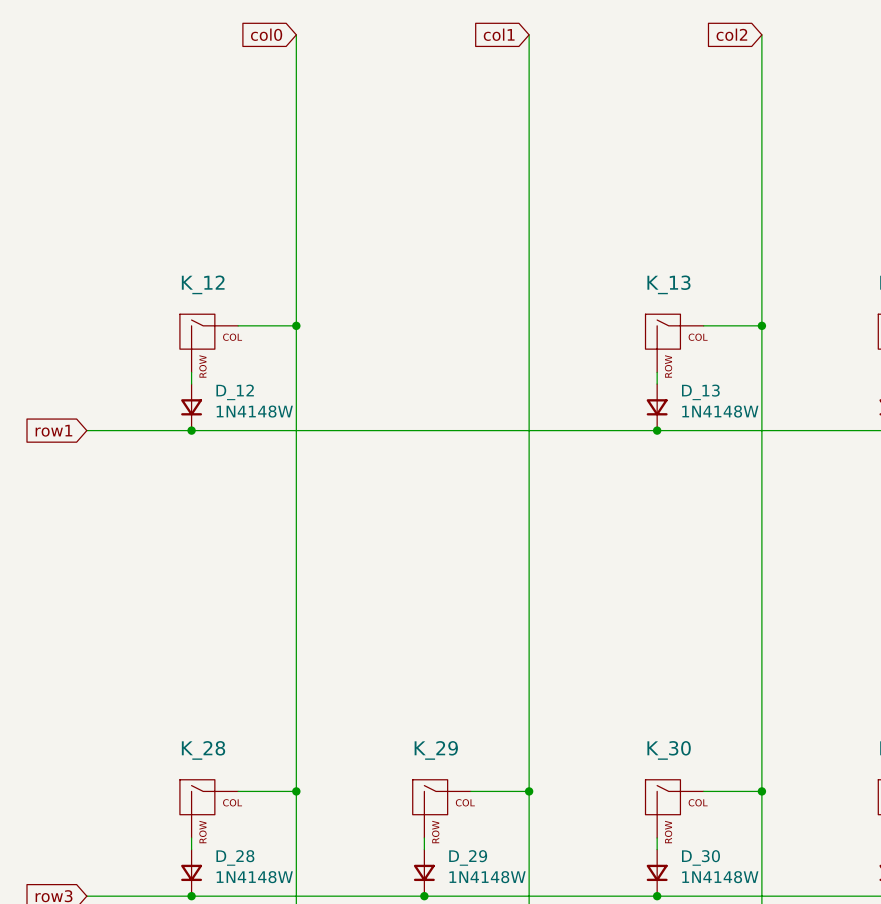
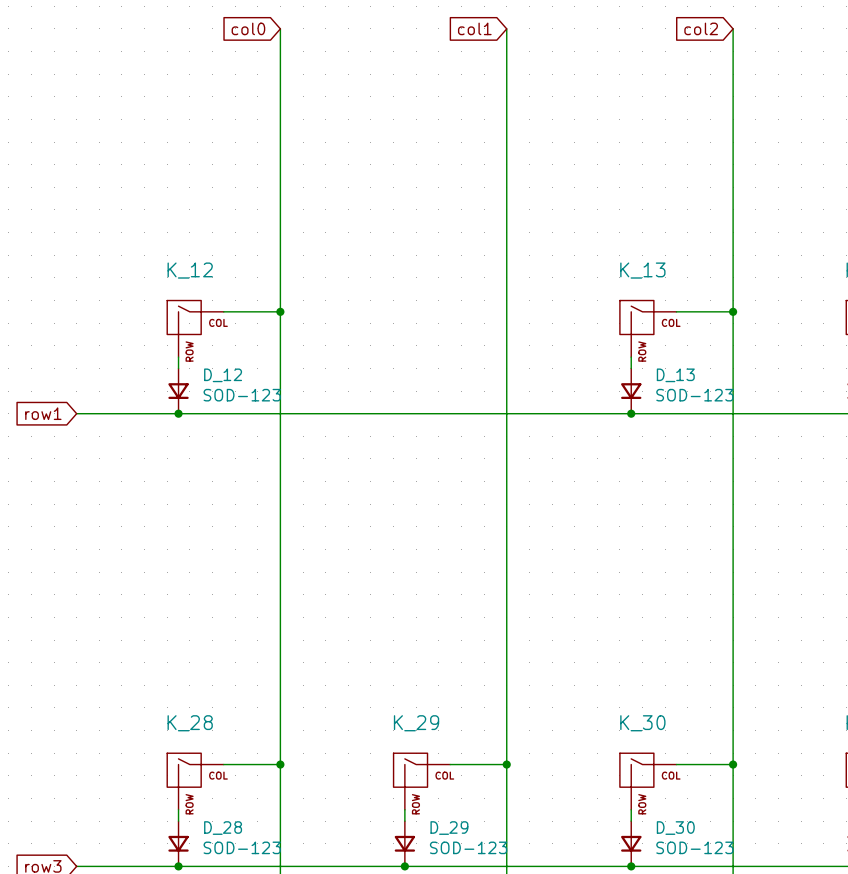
D_12 value: 1N4148W (254, 411) -> SOD-123 (242, 395)
D_13 value: 1N4148W (720, 411) -> SOD-123 (694, 395)
D_28 value: 1N4148W (254, 877) -> SOD-123 (242, 847)
D_29 value: 1N4148W (487, 877) -> SOD-123 (468, 847)
D_30 value: 1N4148W (720, 877) -> SOD-123 (694, 847)

